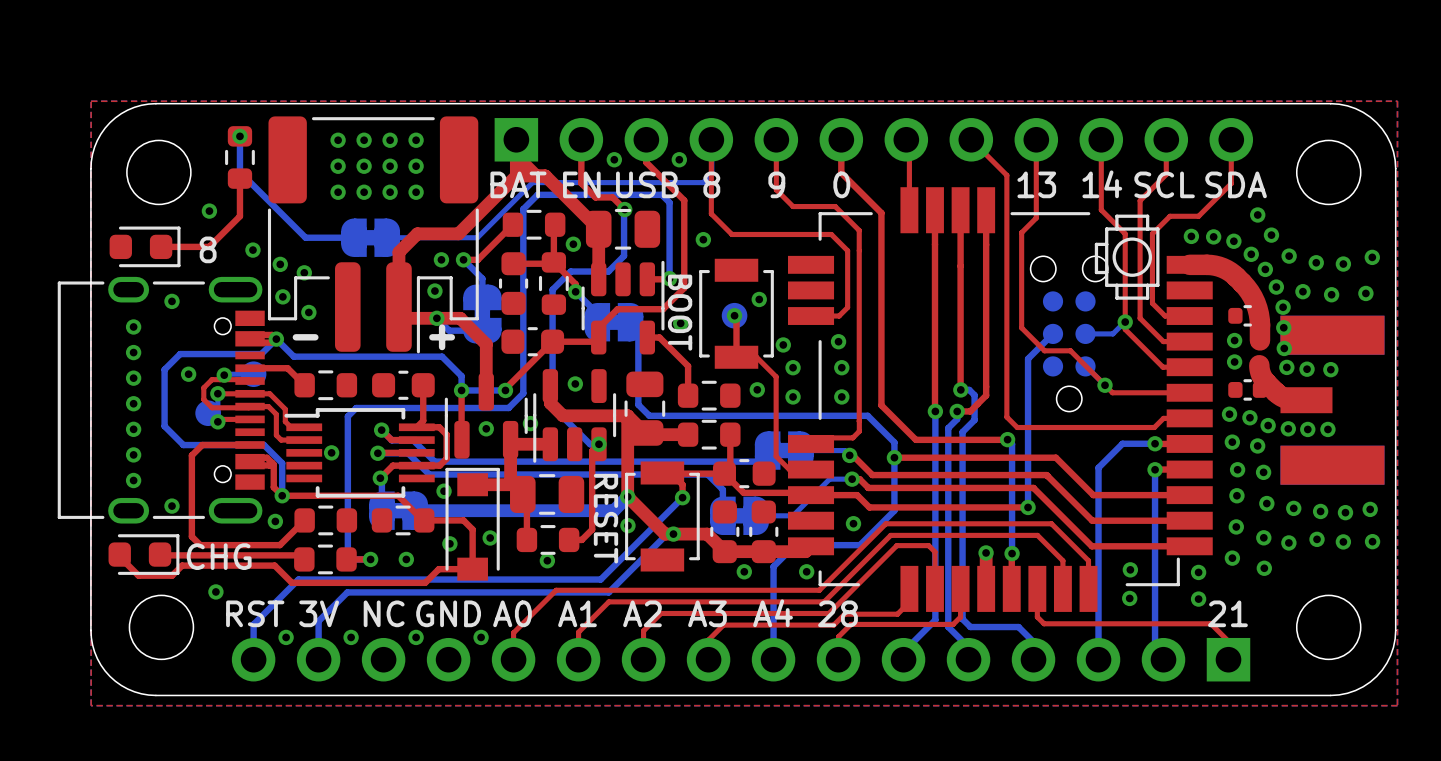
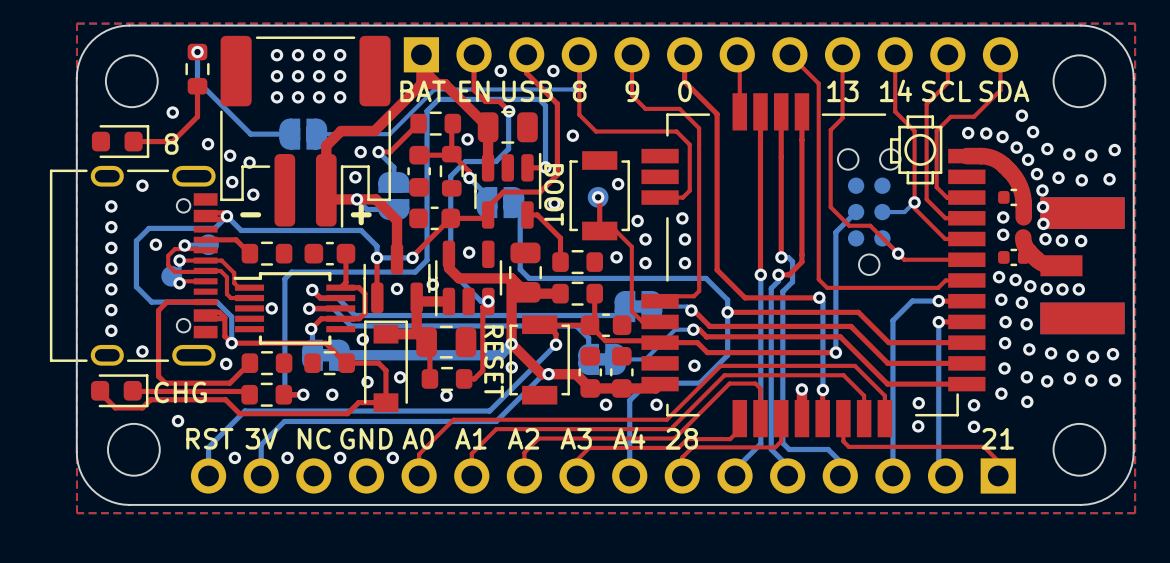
part footprint: [341, 218, 401, 257] -> [279, 118, 328, 150]
part footprint: [463, 284, 502, 344] -> [378, 172, 410, 220]
part footprint: [584, 303, 644, 342] -> [476, 187, 525, 219]

